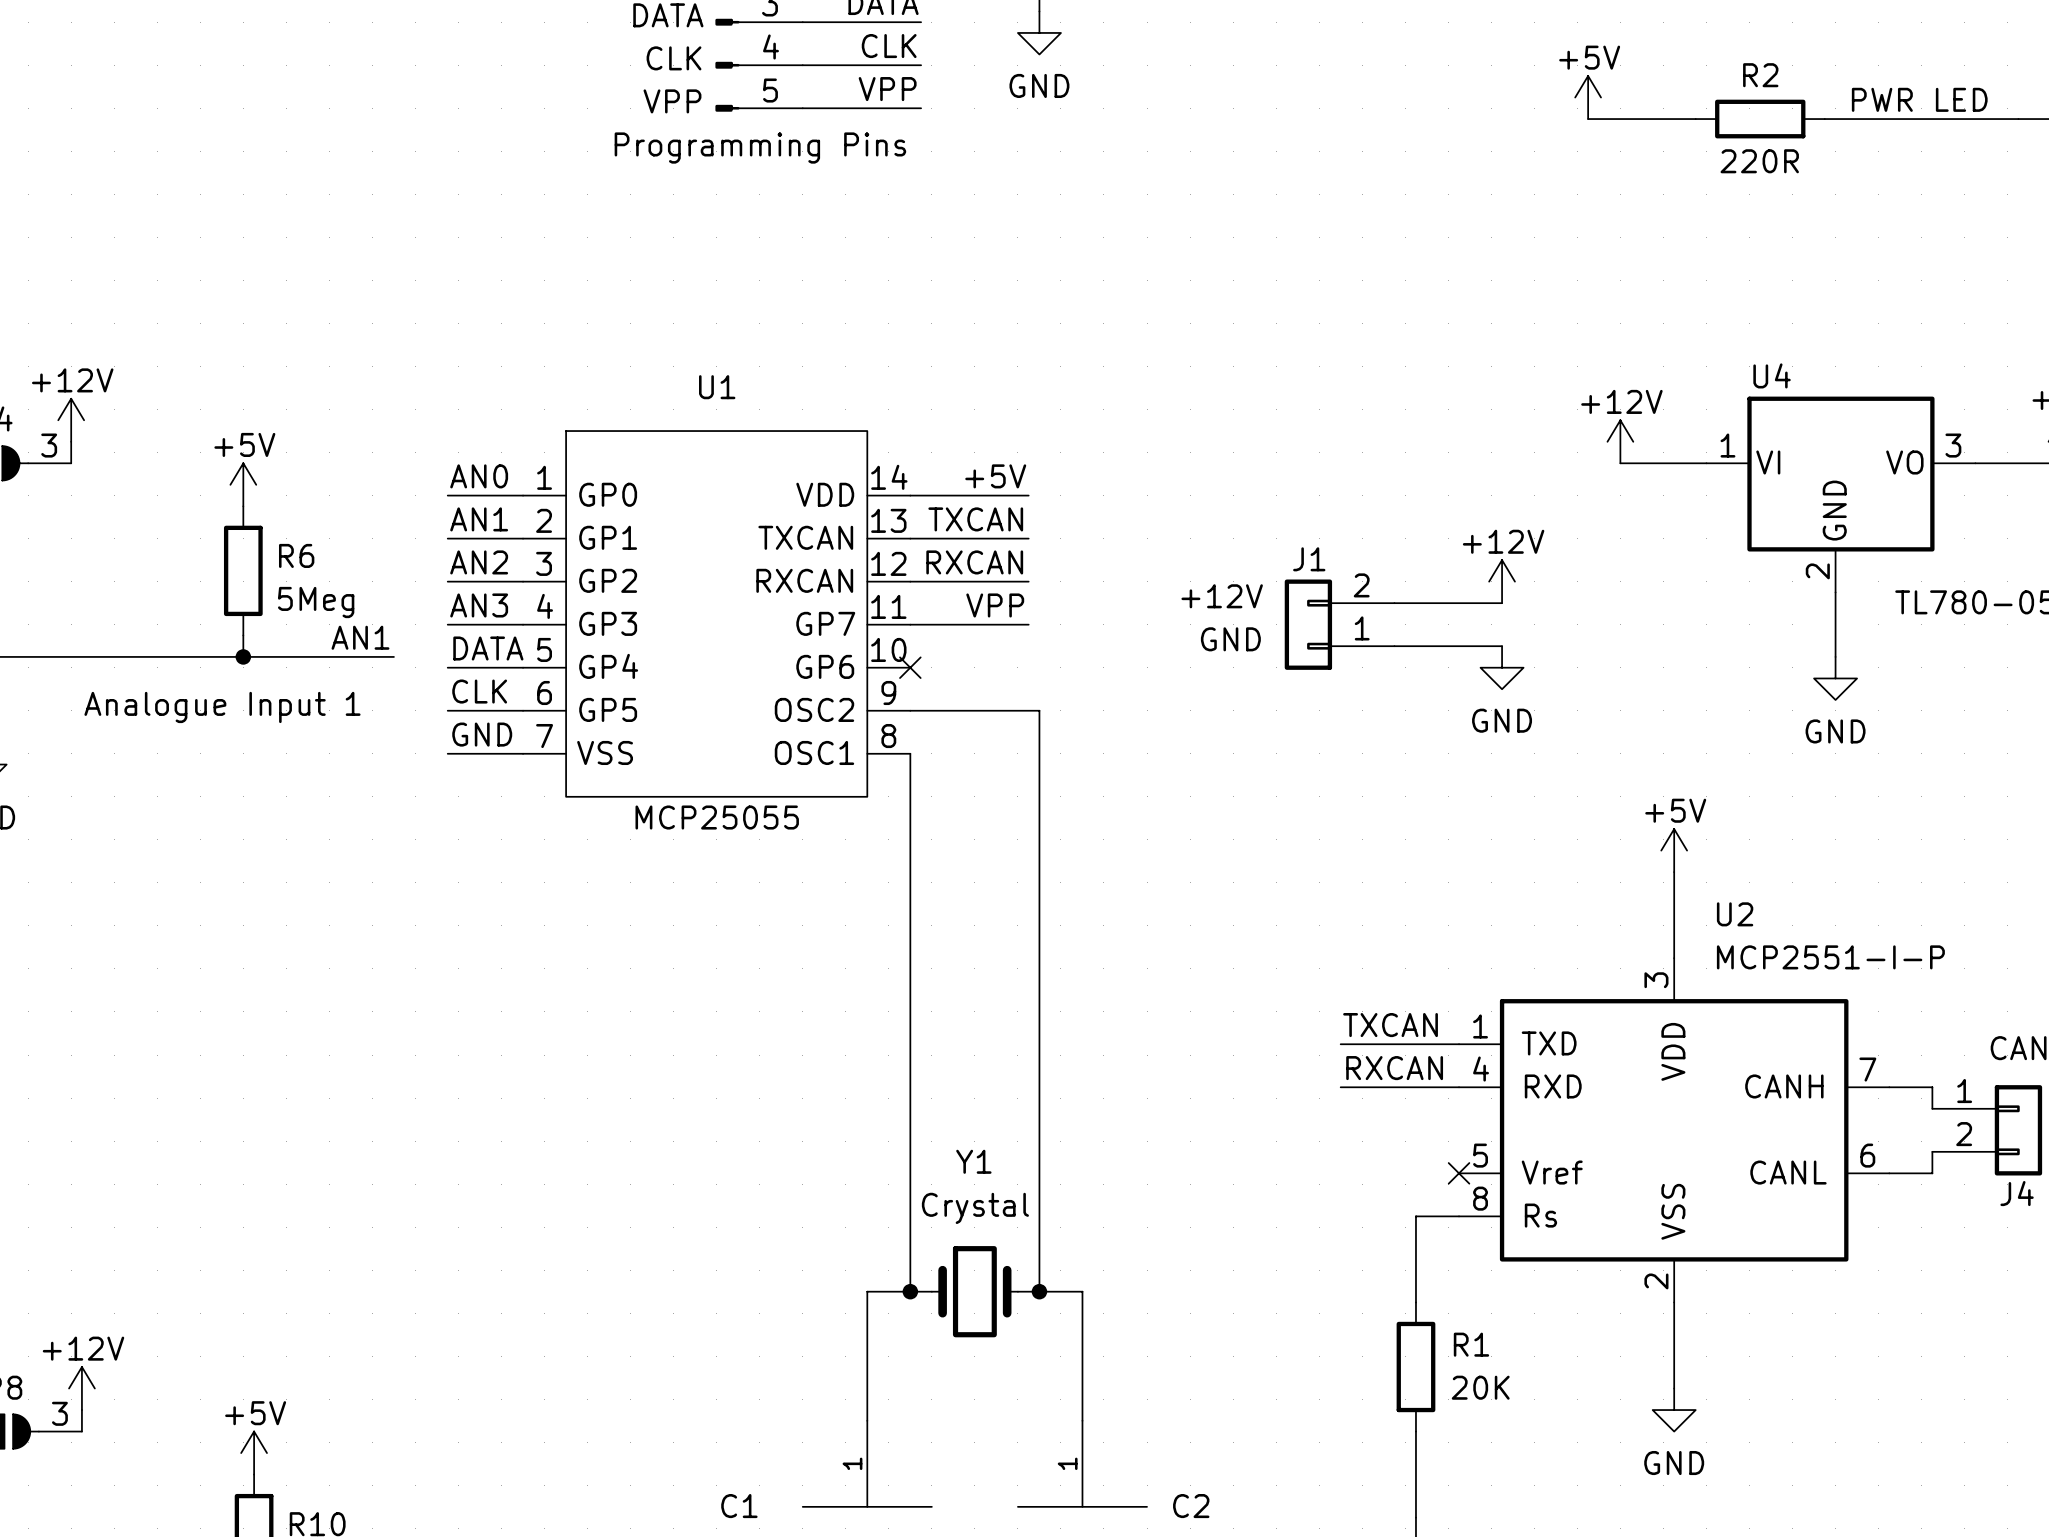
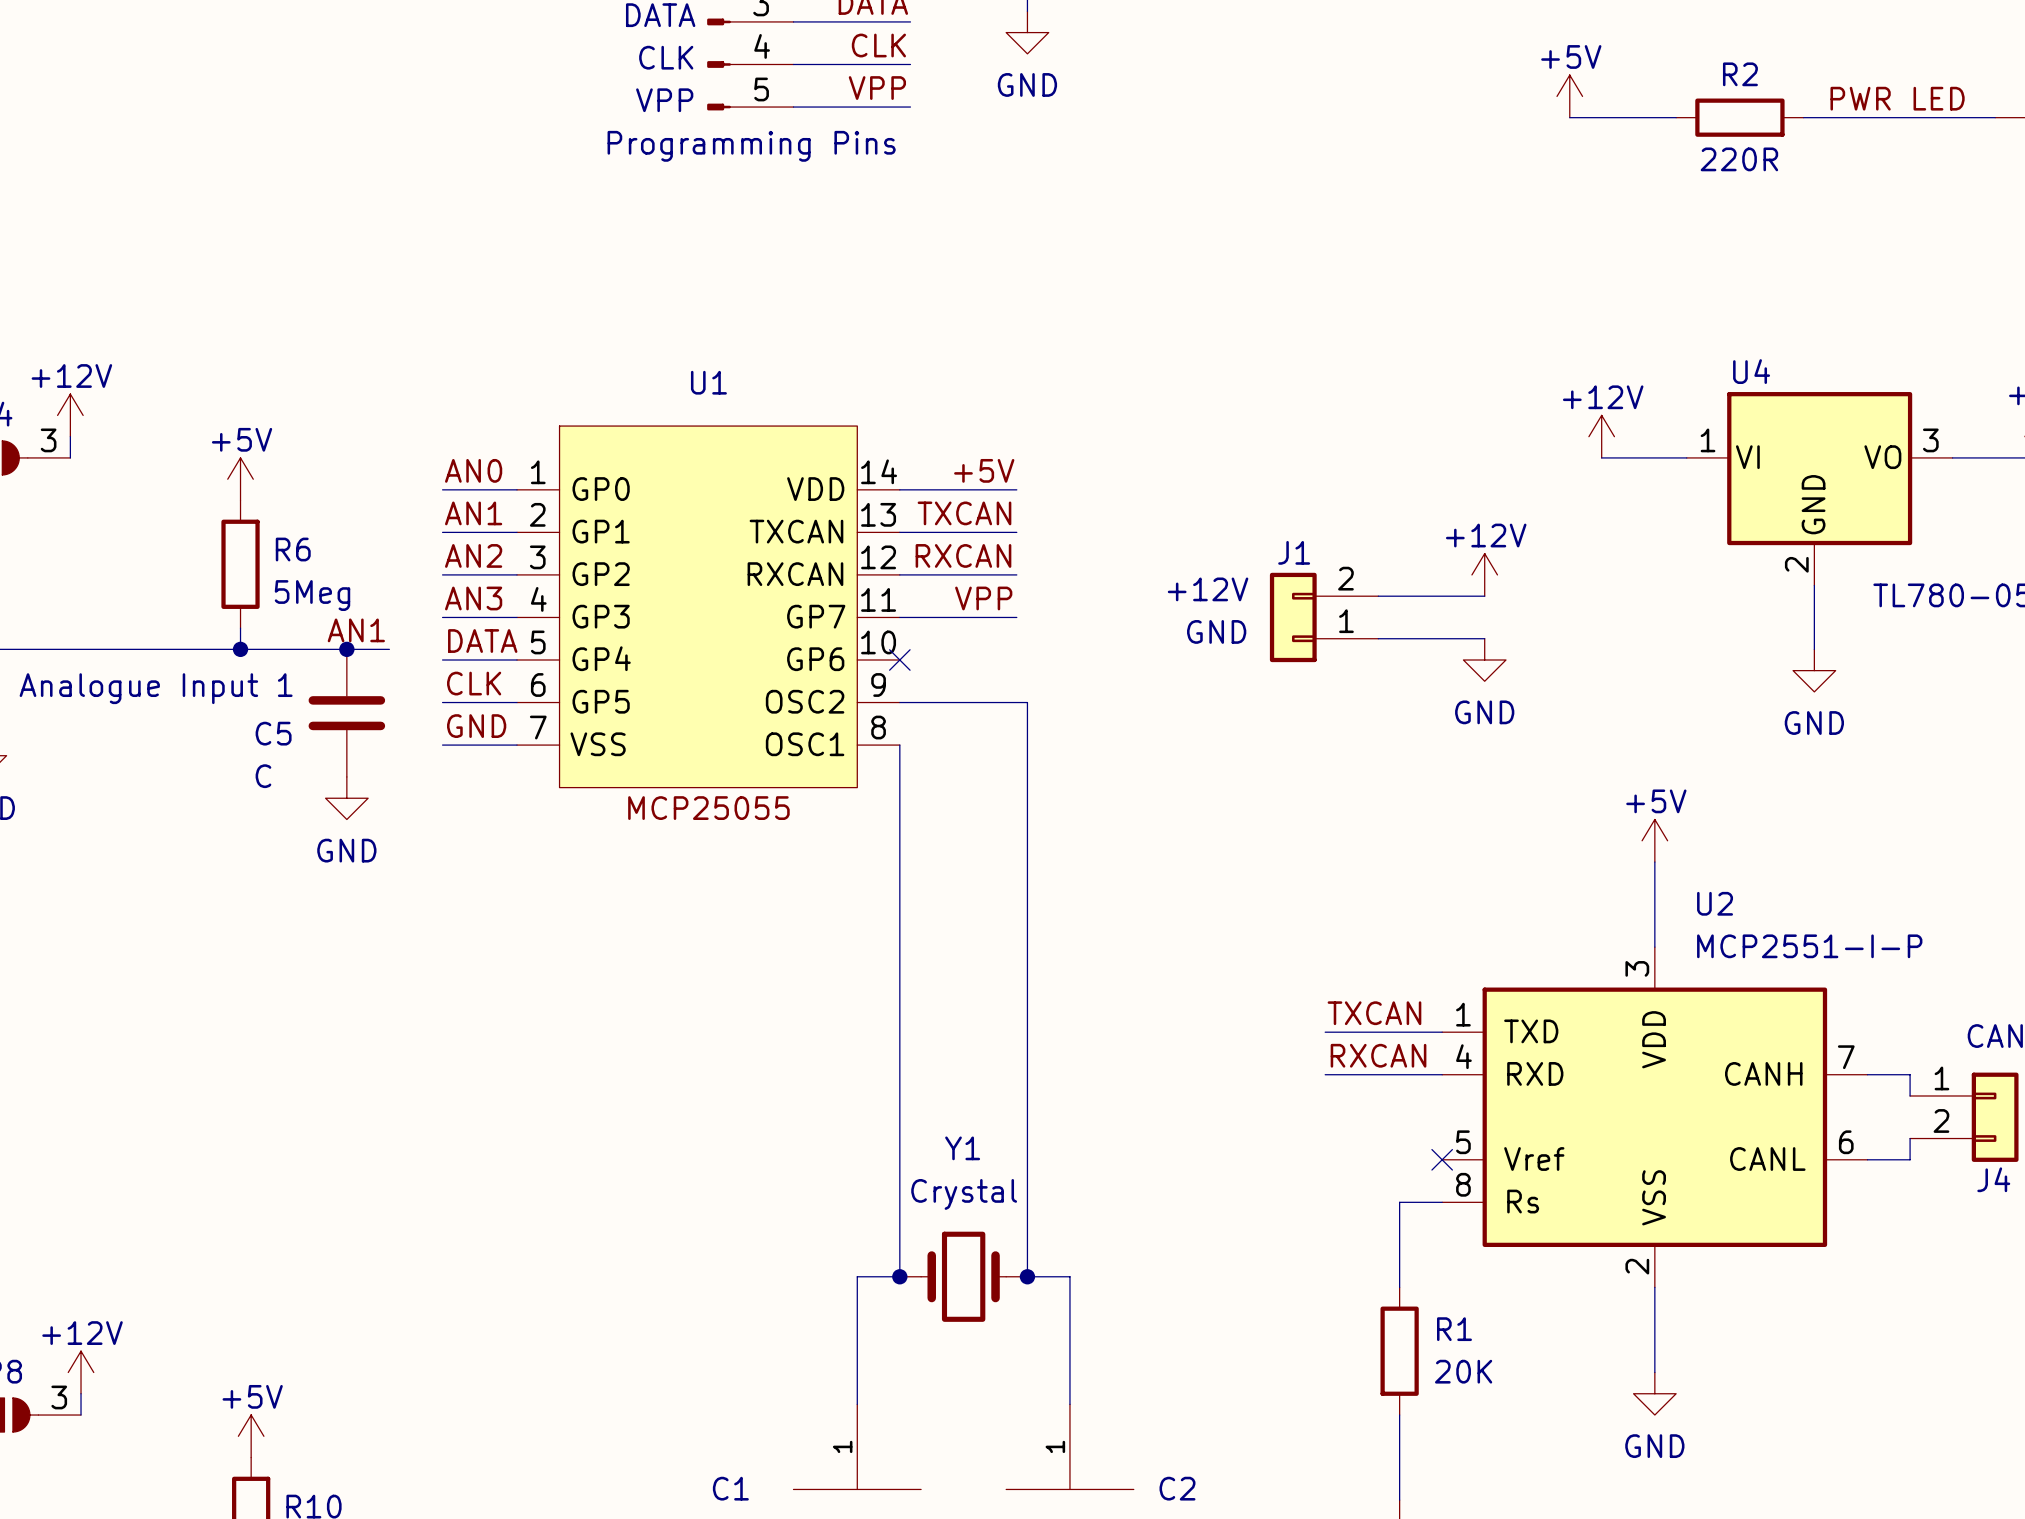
junction: none -> (346, 649)
text position: Analogue Input 1 (222, 707) -> Analogue Input 1 (156, 688)
C5: none -> C (346, 713)
power symbol: none -> GND (346, 798)

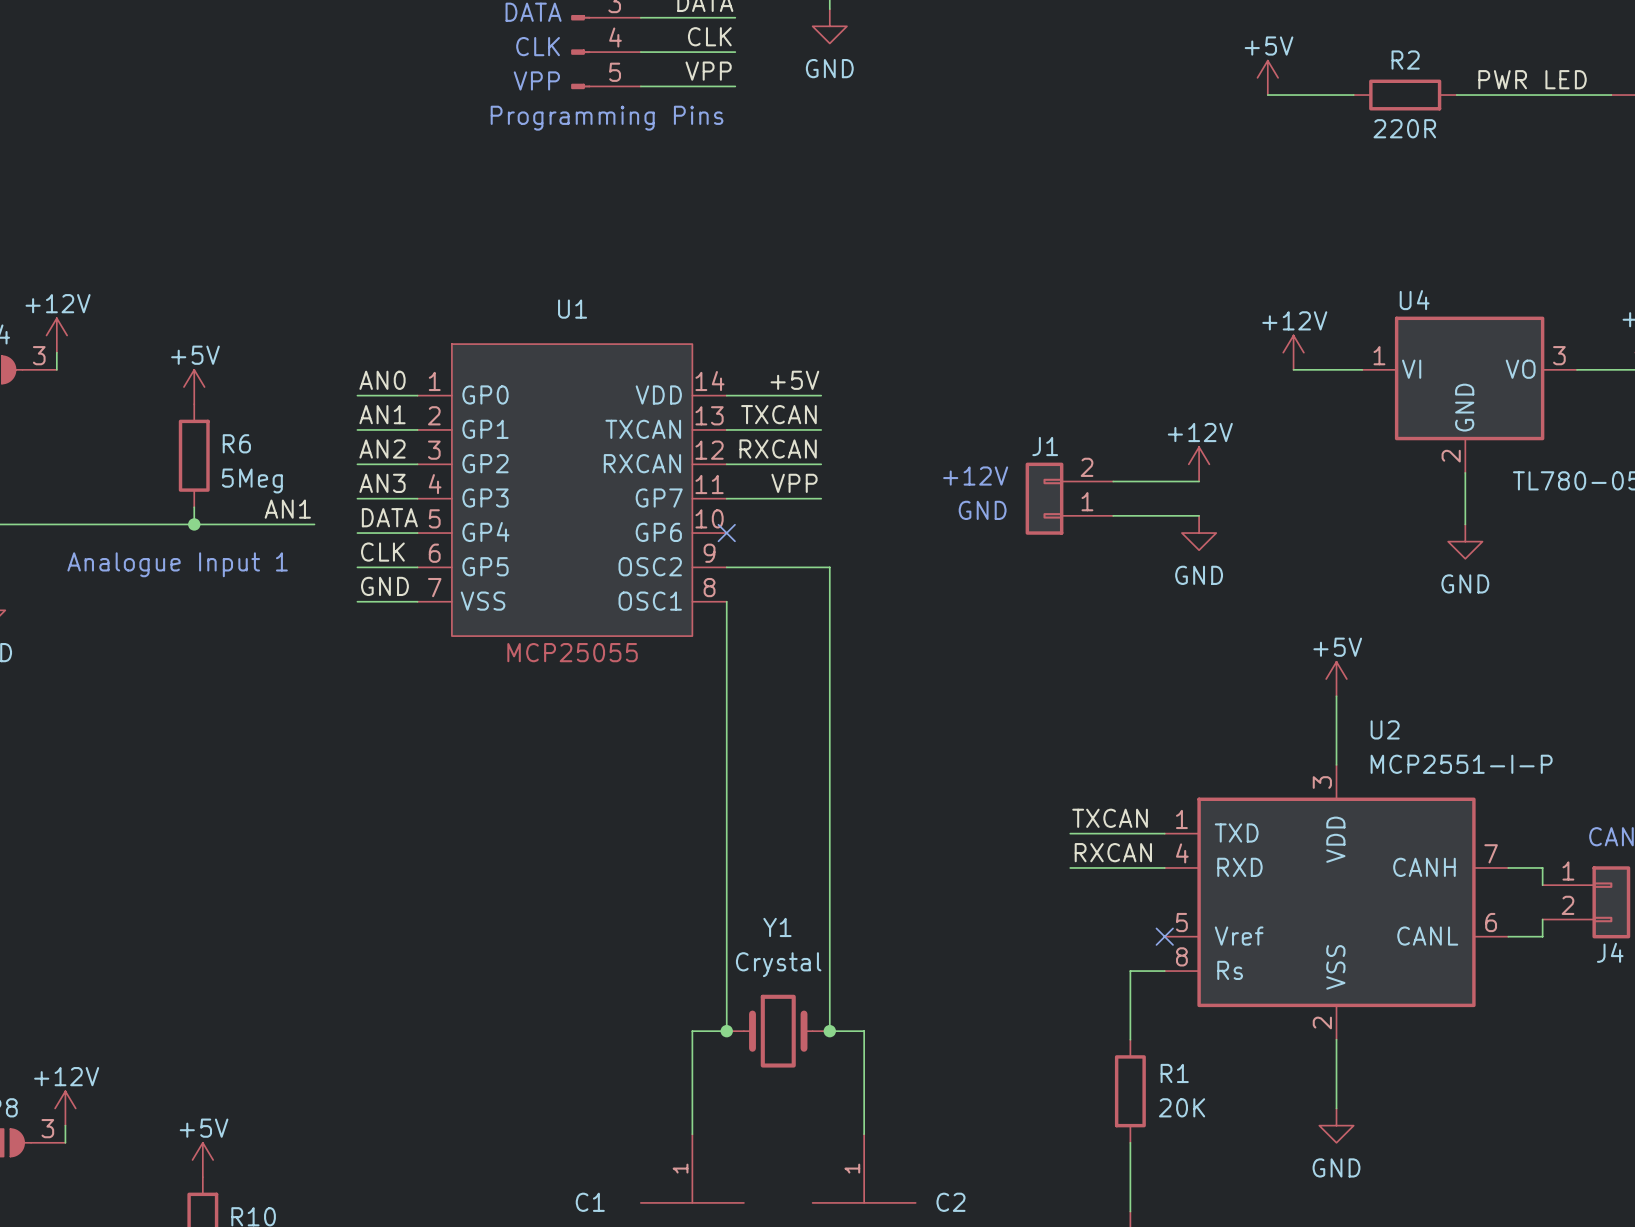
junction: (346, 649) -> none
text position: Analogue Input 1 (156, 688) -> Analogue Input 1 (177, 564)
C5: C (346, 713) -> none
power symbol: GND (346, 798) -> none

